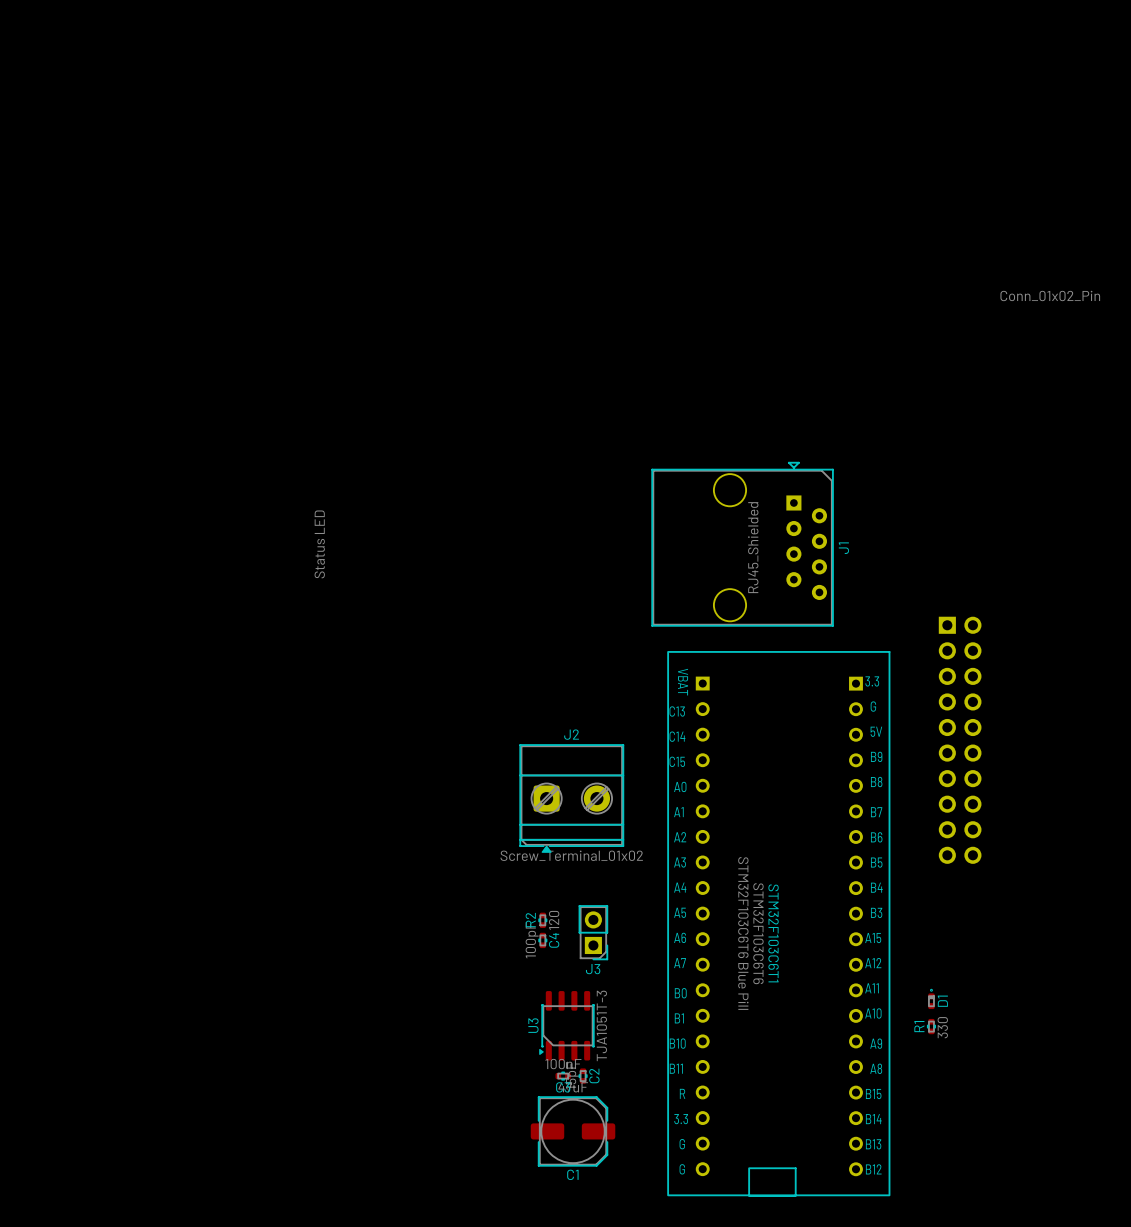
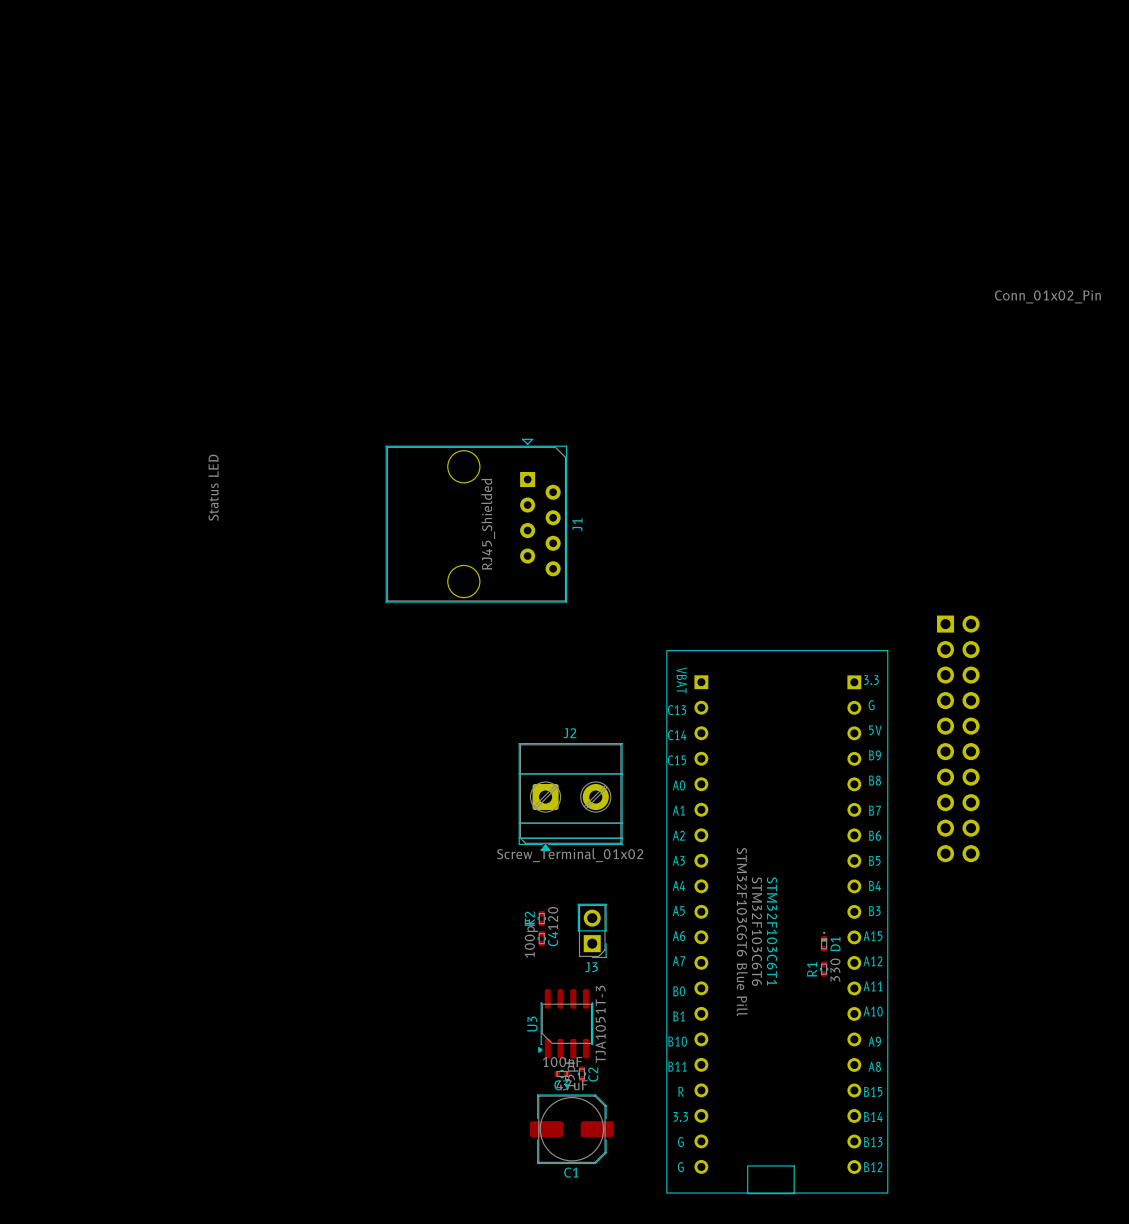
J1 position: (742, 544) -> (476, 520)
D1 position: (931, 999) -> (824, 941)
R1 position: (931, 1026) -> (824, 969)

